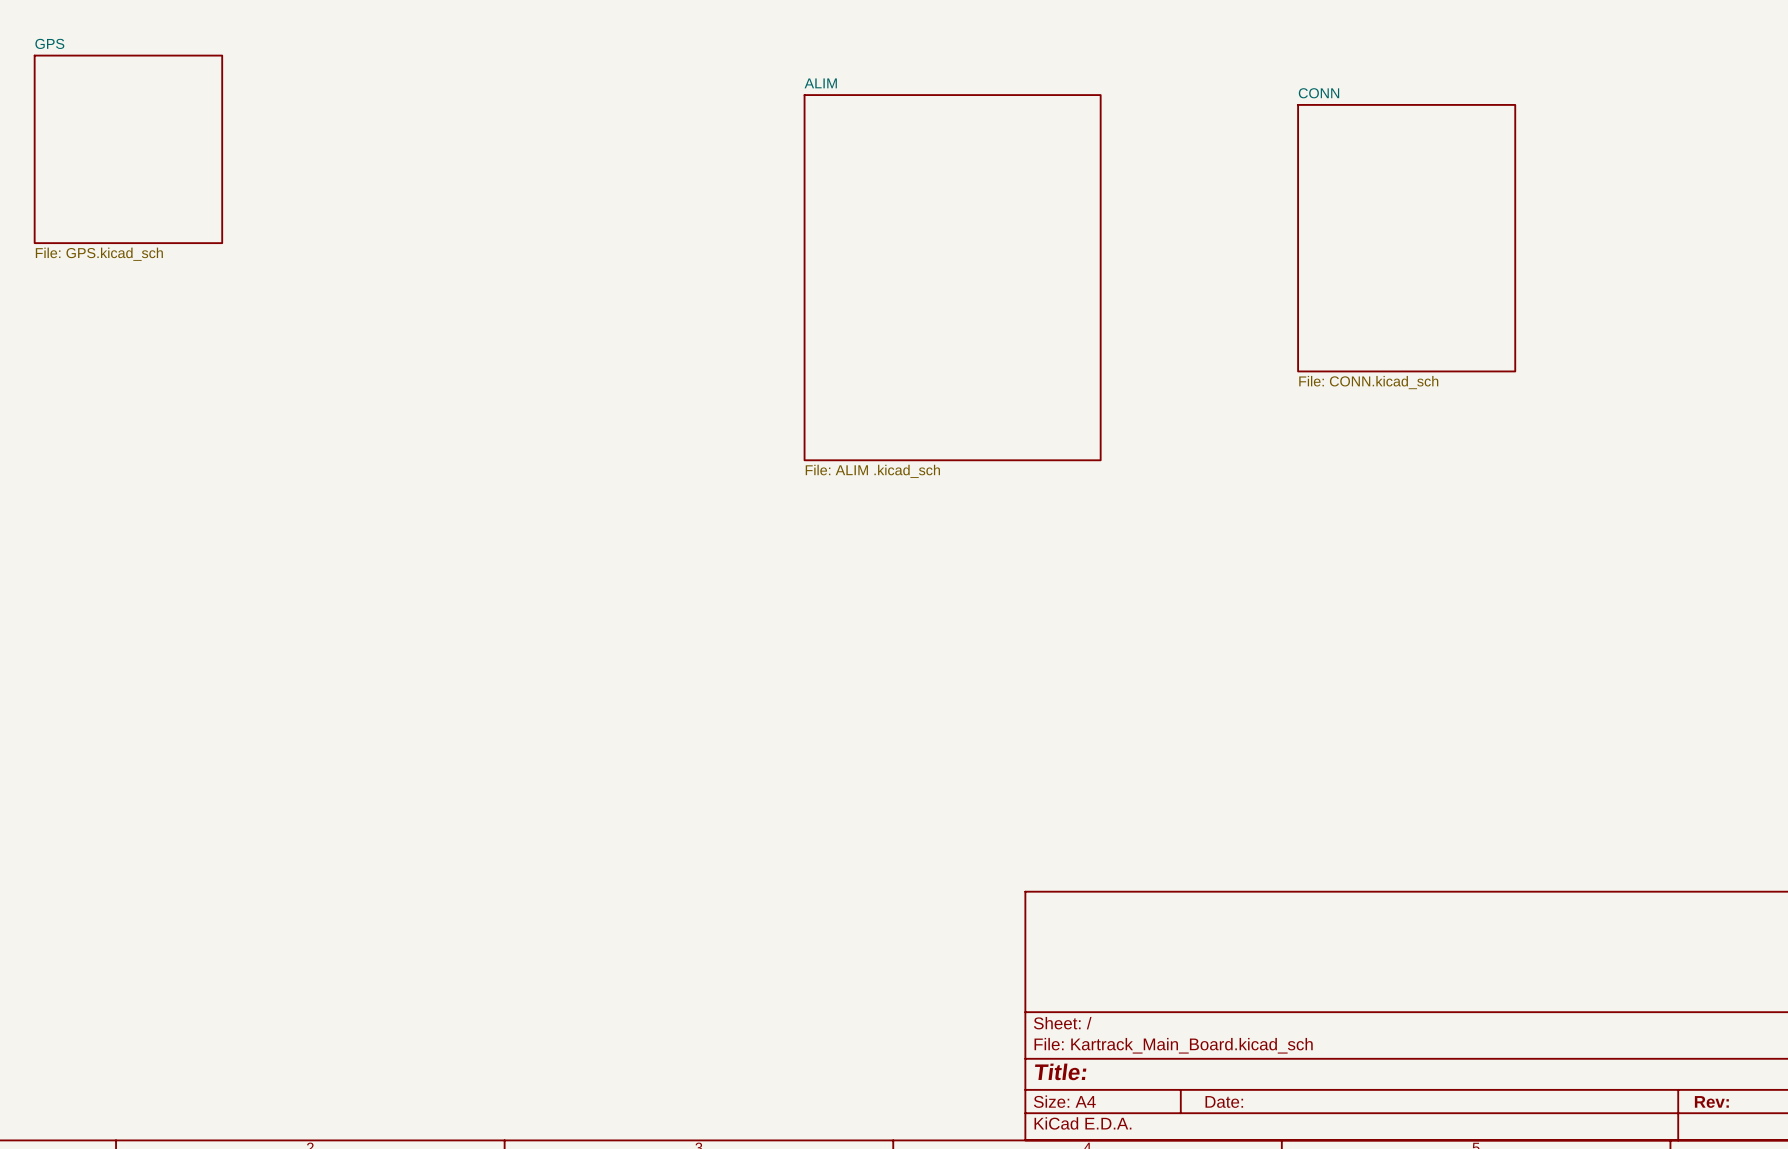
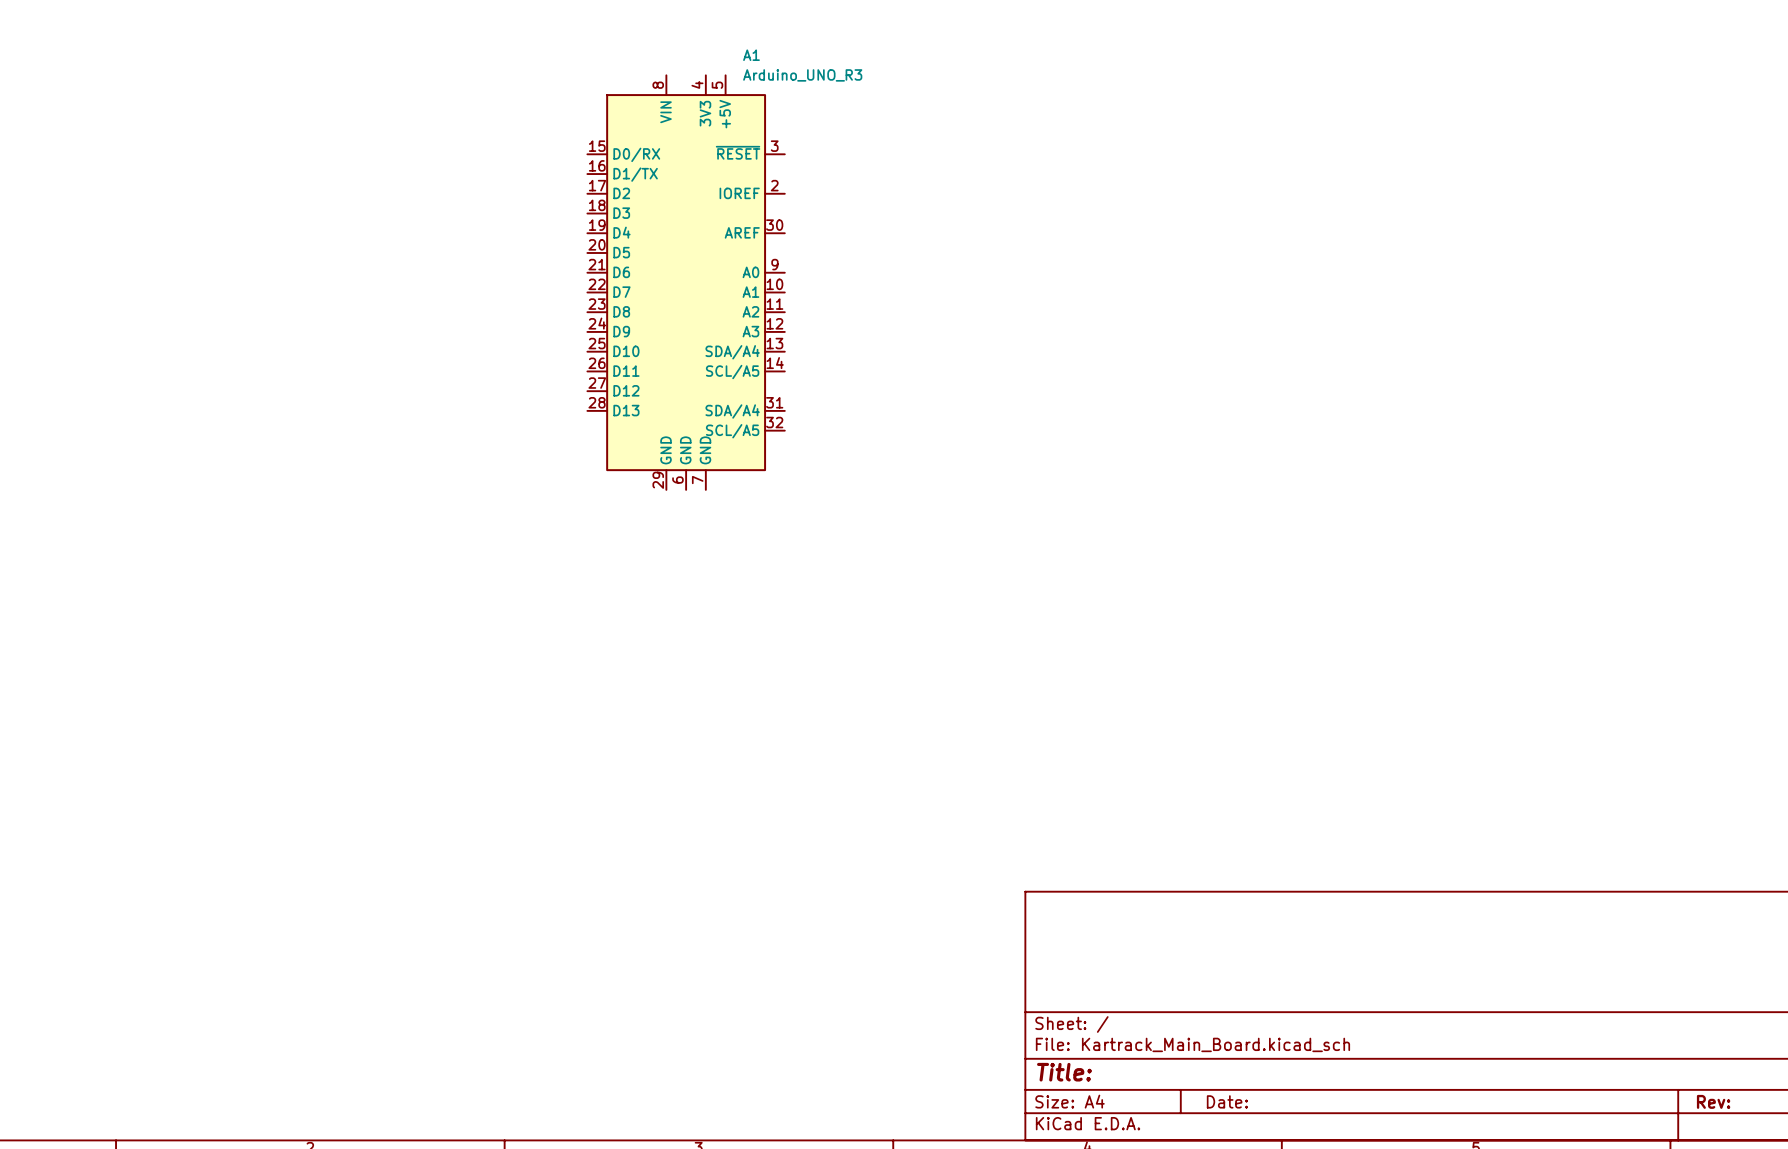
sheet GPS: File: GPS.kicad_sch (128, 149) -> none
sheet CONN: File: CONN.kicad_sch (1406, 238) -> none
sheet ALIM: File: ALIM .kicad_sch (952, 277) -> none
A1: none -> Arduino_UNO_R3 (686, 282)

